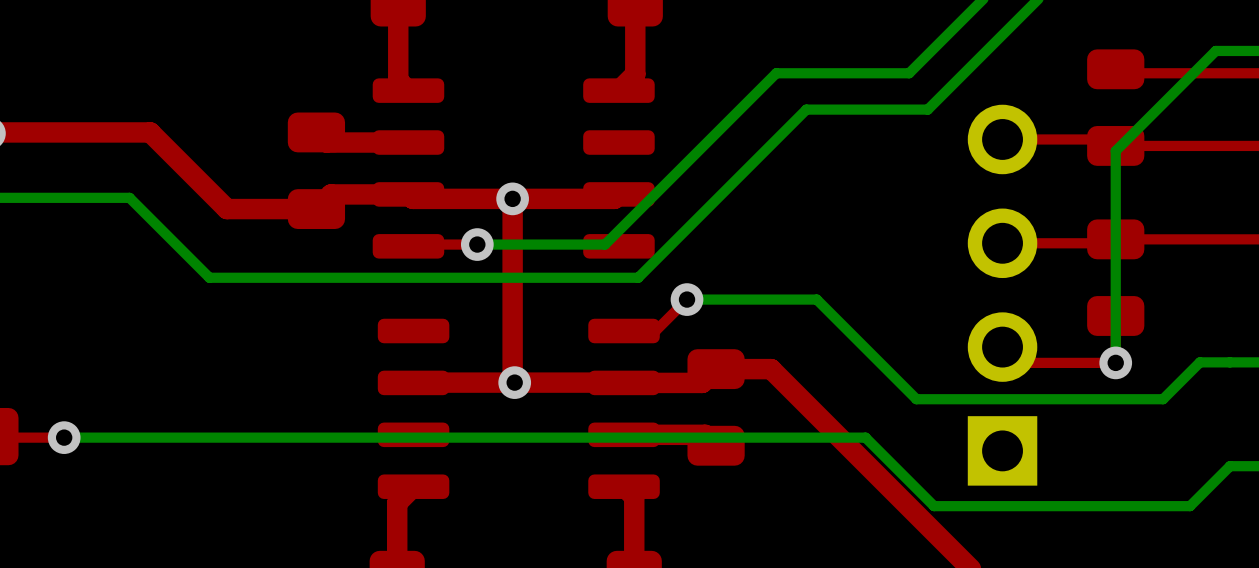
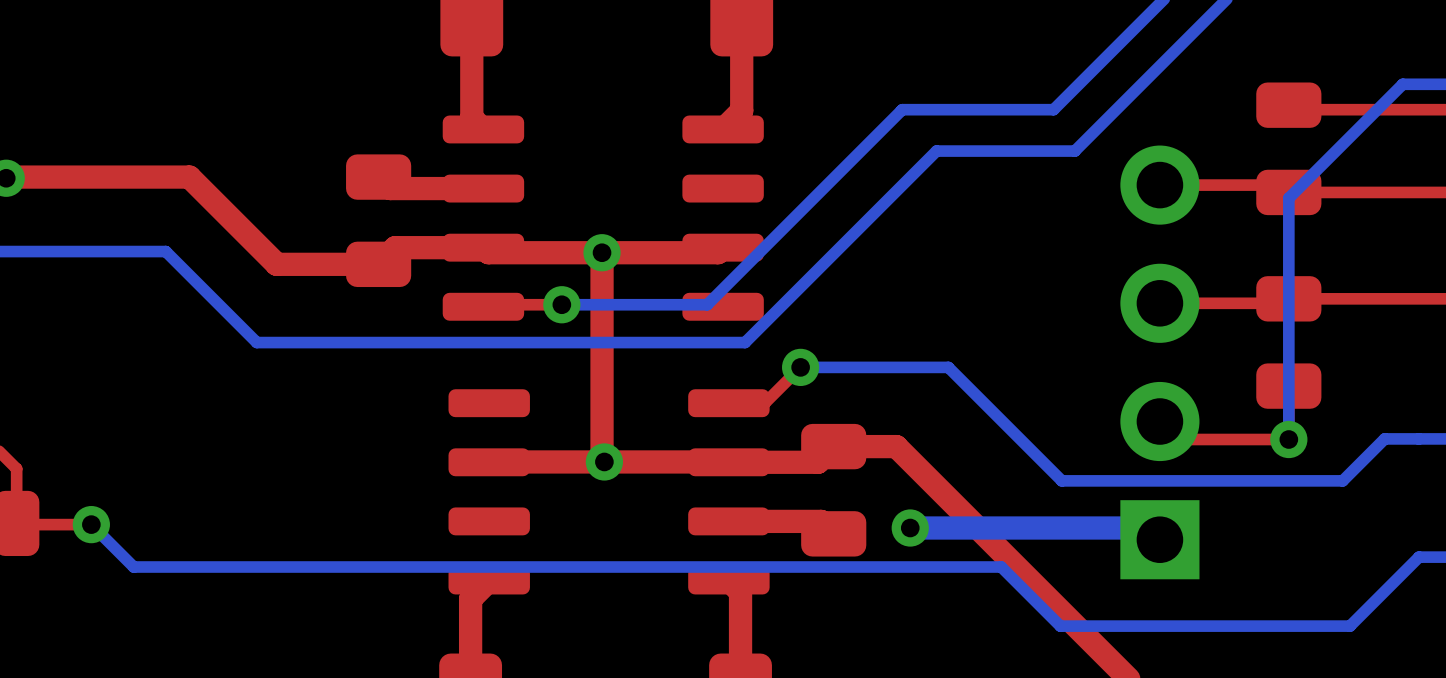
bottom track: (64, 437) (865, 437) (934, 506) (1190, 506) -> (91, 524) (133, 567) (1001, 567) (1060, 626) (1350, 626) (1373, 602)
via: none -> (910, 528)
bottom track: none -> (910, 531) (910, 528) (1148, 528) (1159, 539)

